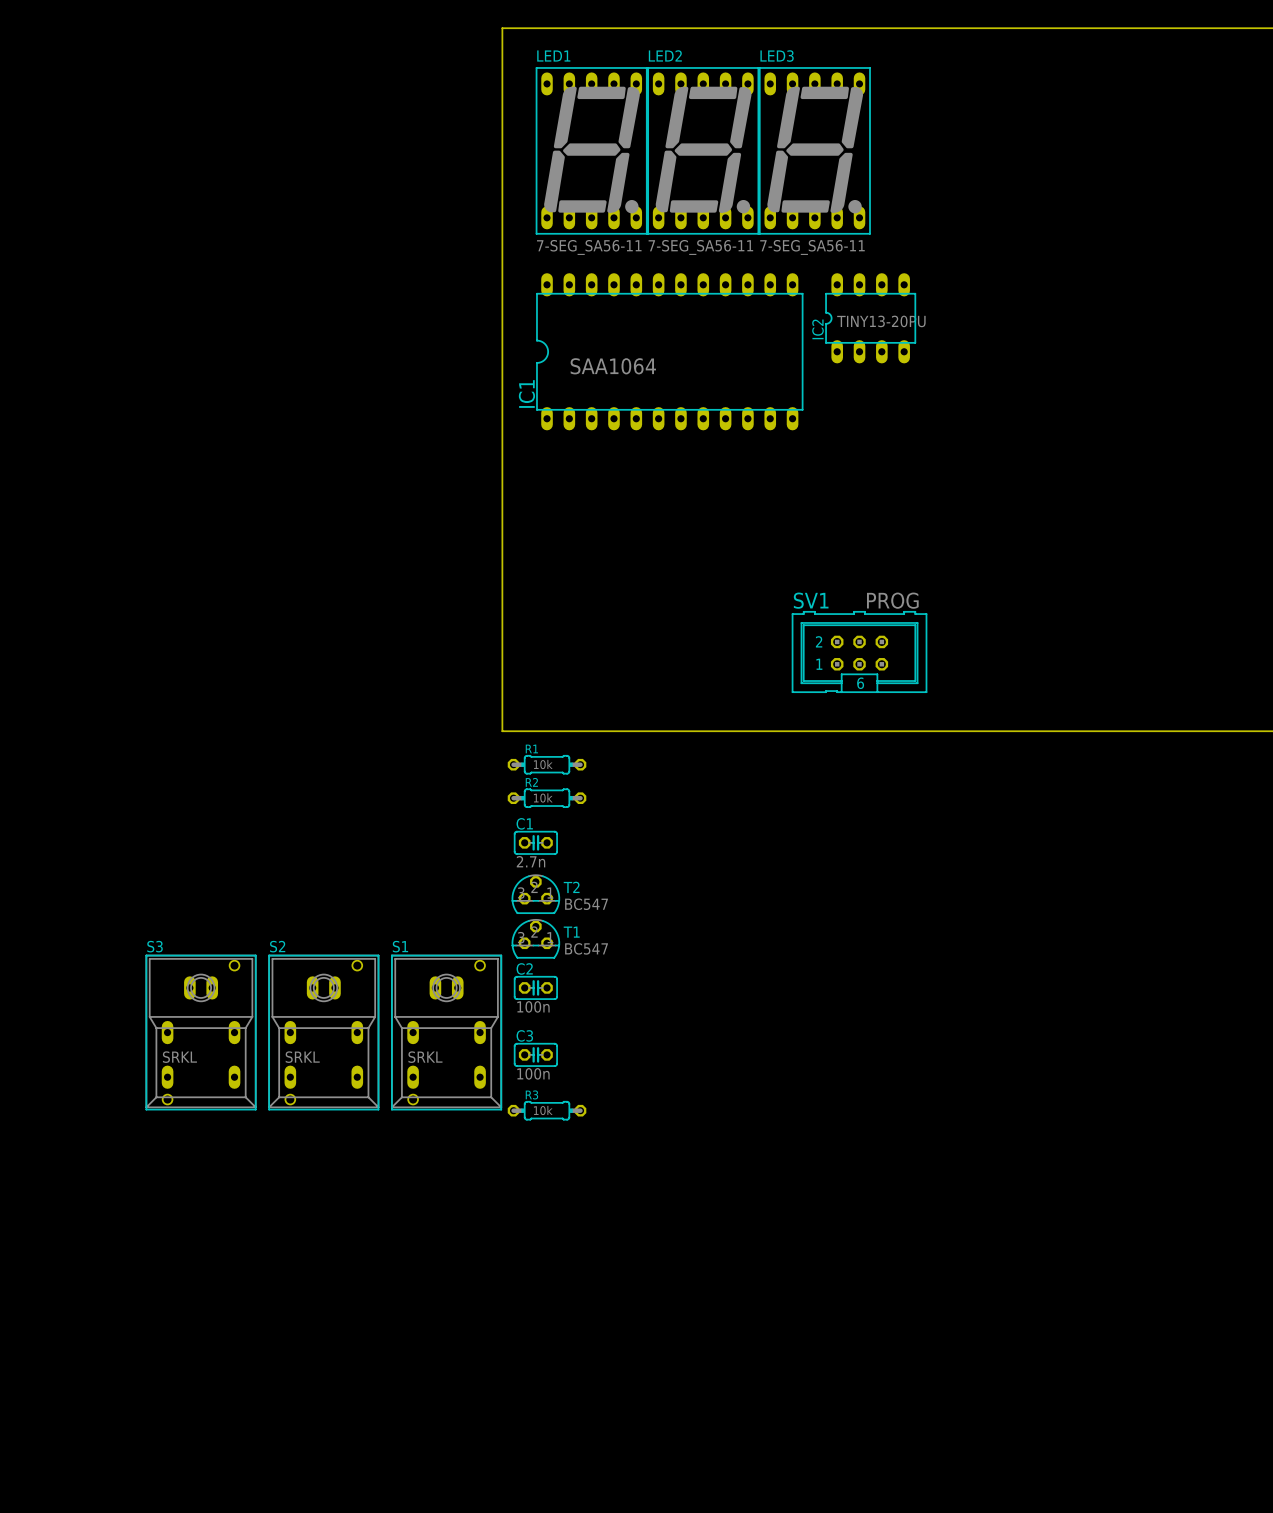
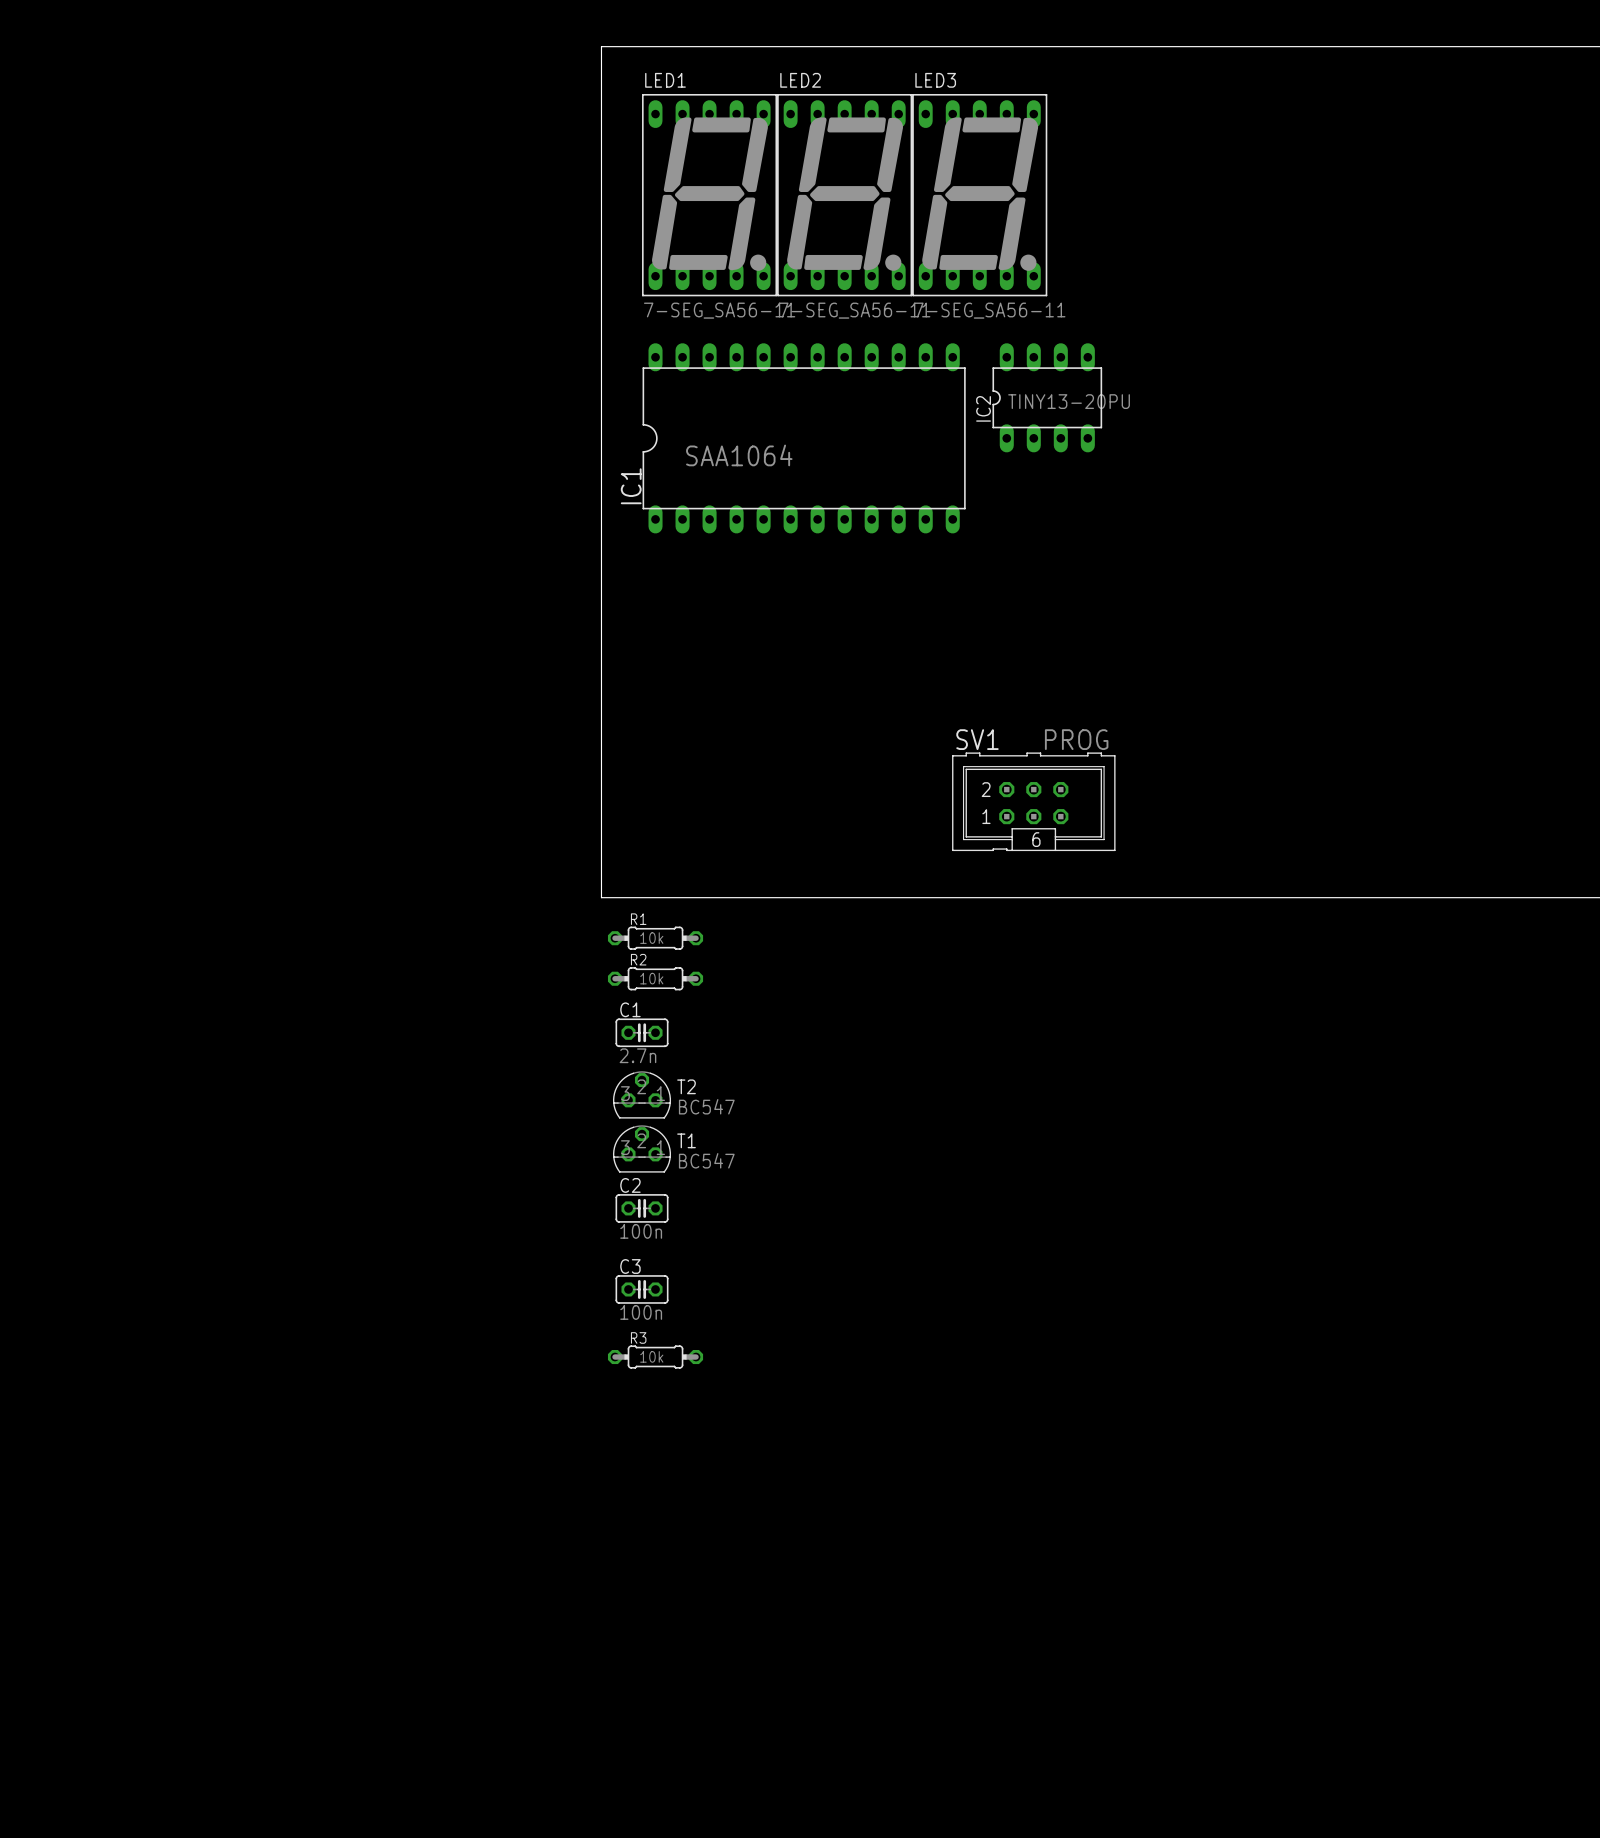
S3: SRKL (201, 1032) -> none
S2: SRKL (323, 1032) -> none
S1: SRKL (446, 1032) -> none

